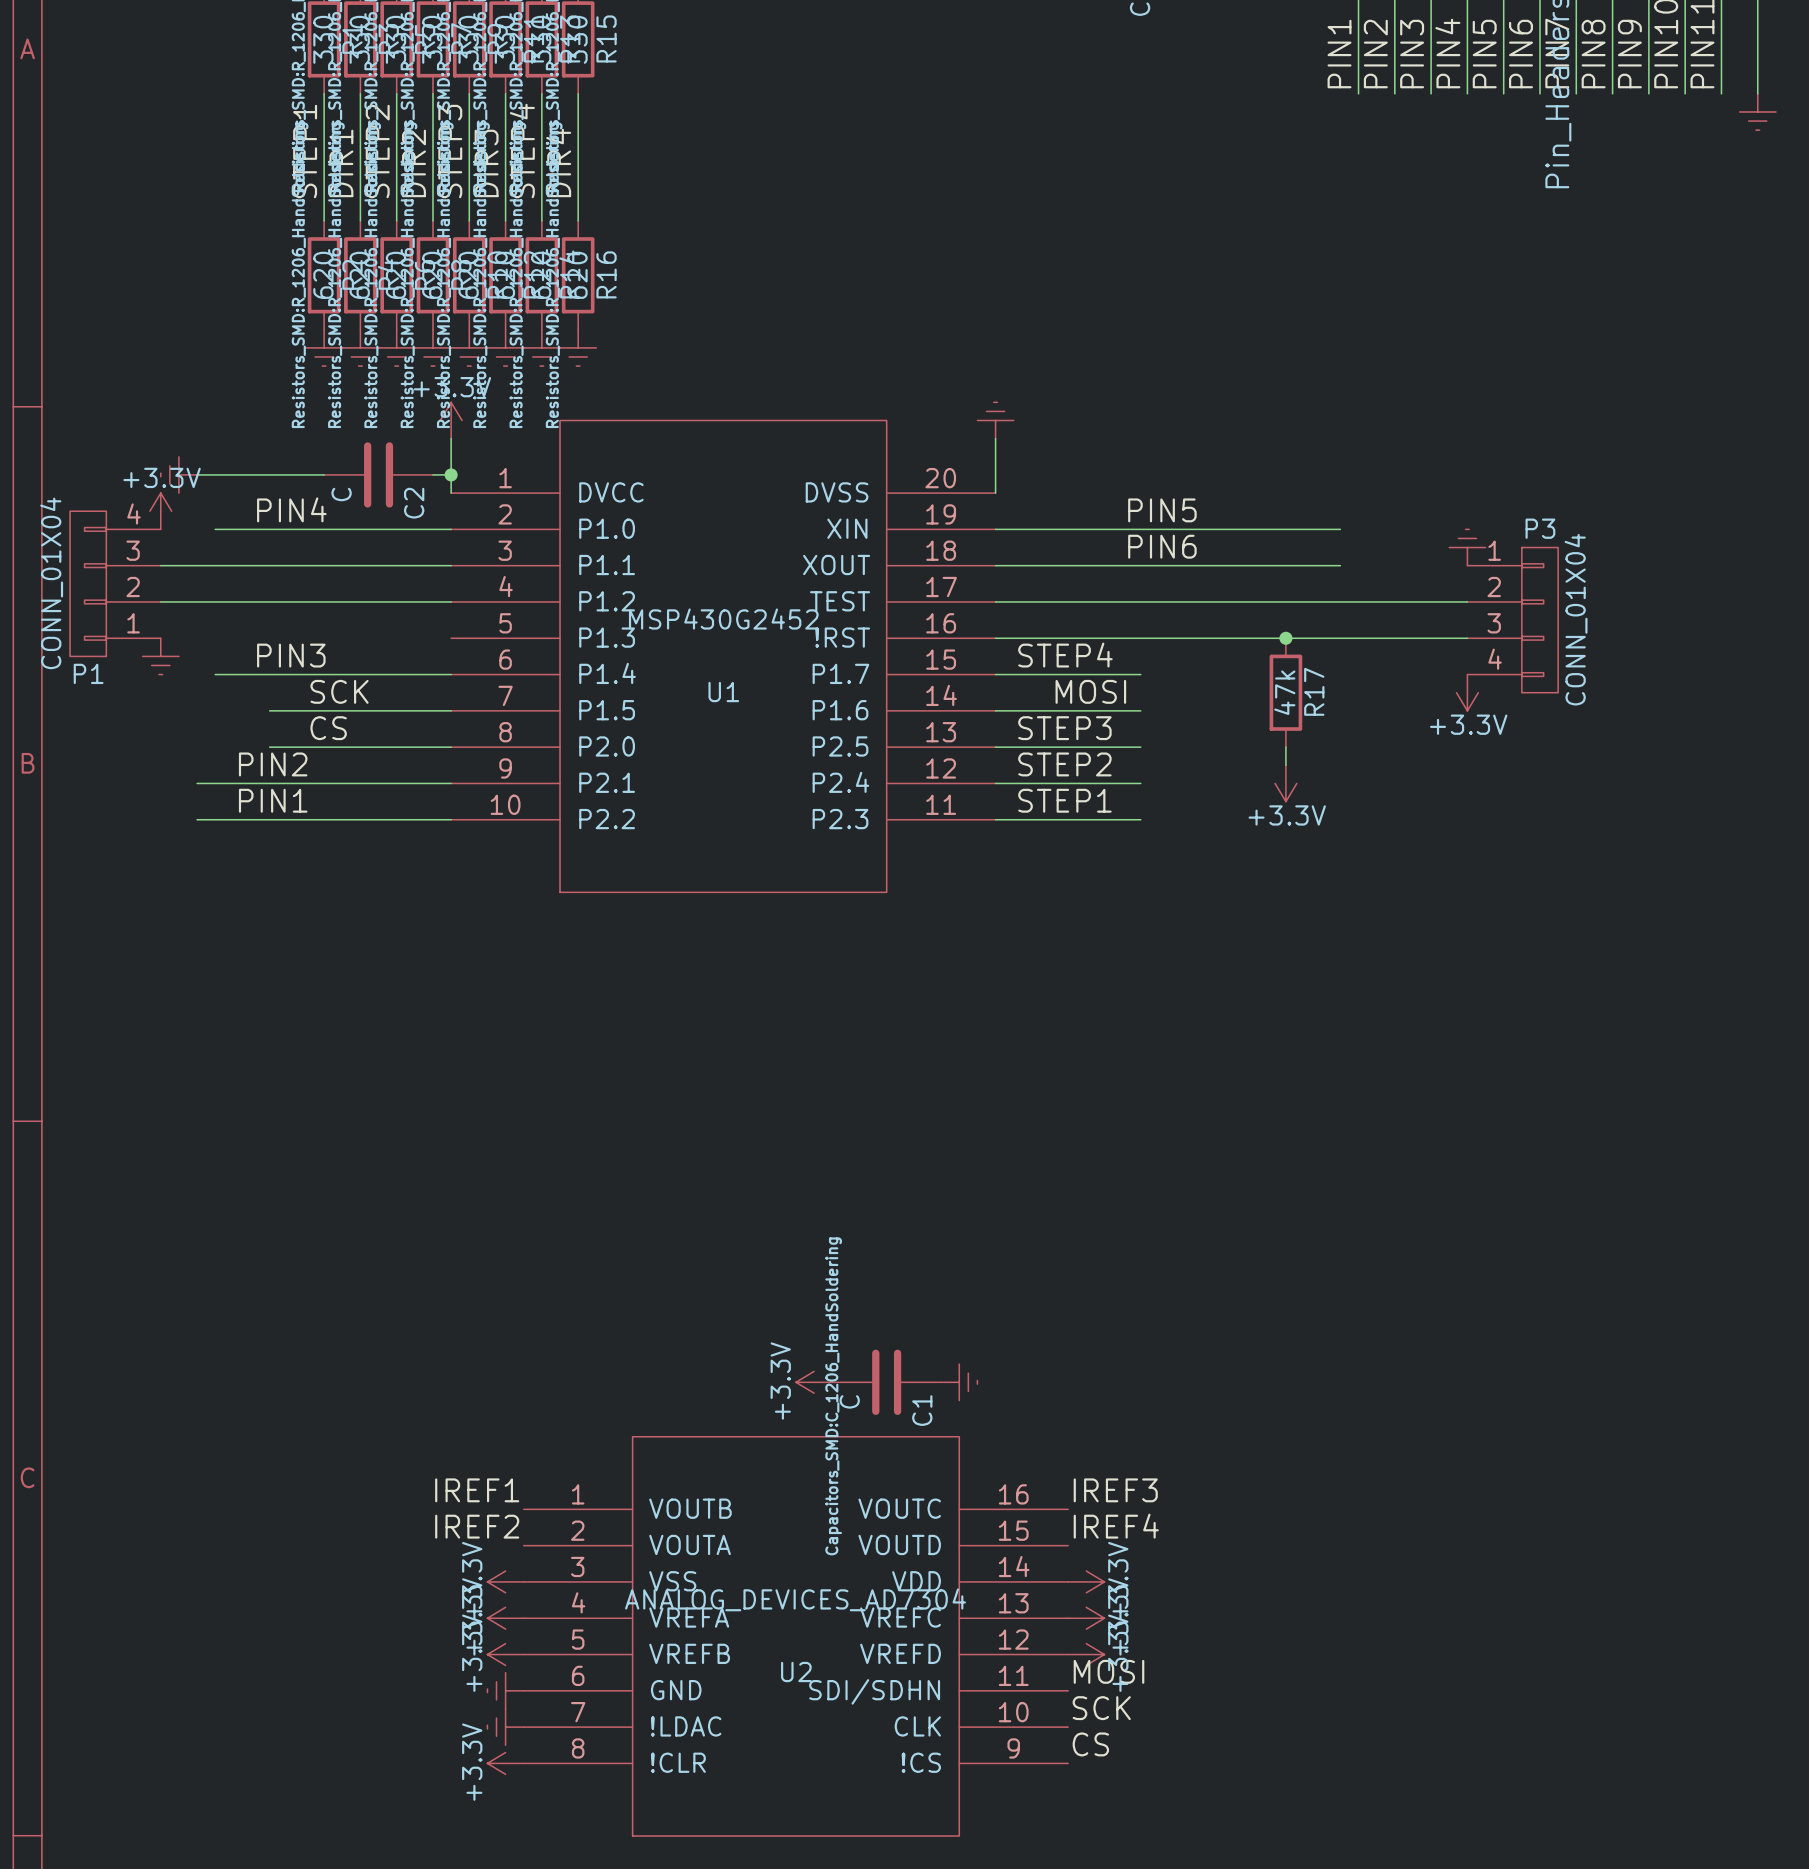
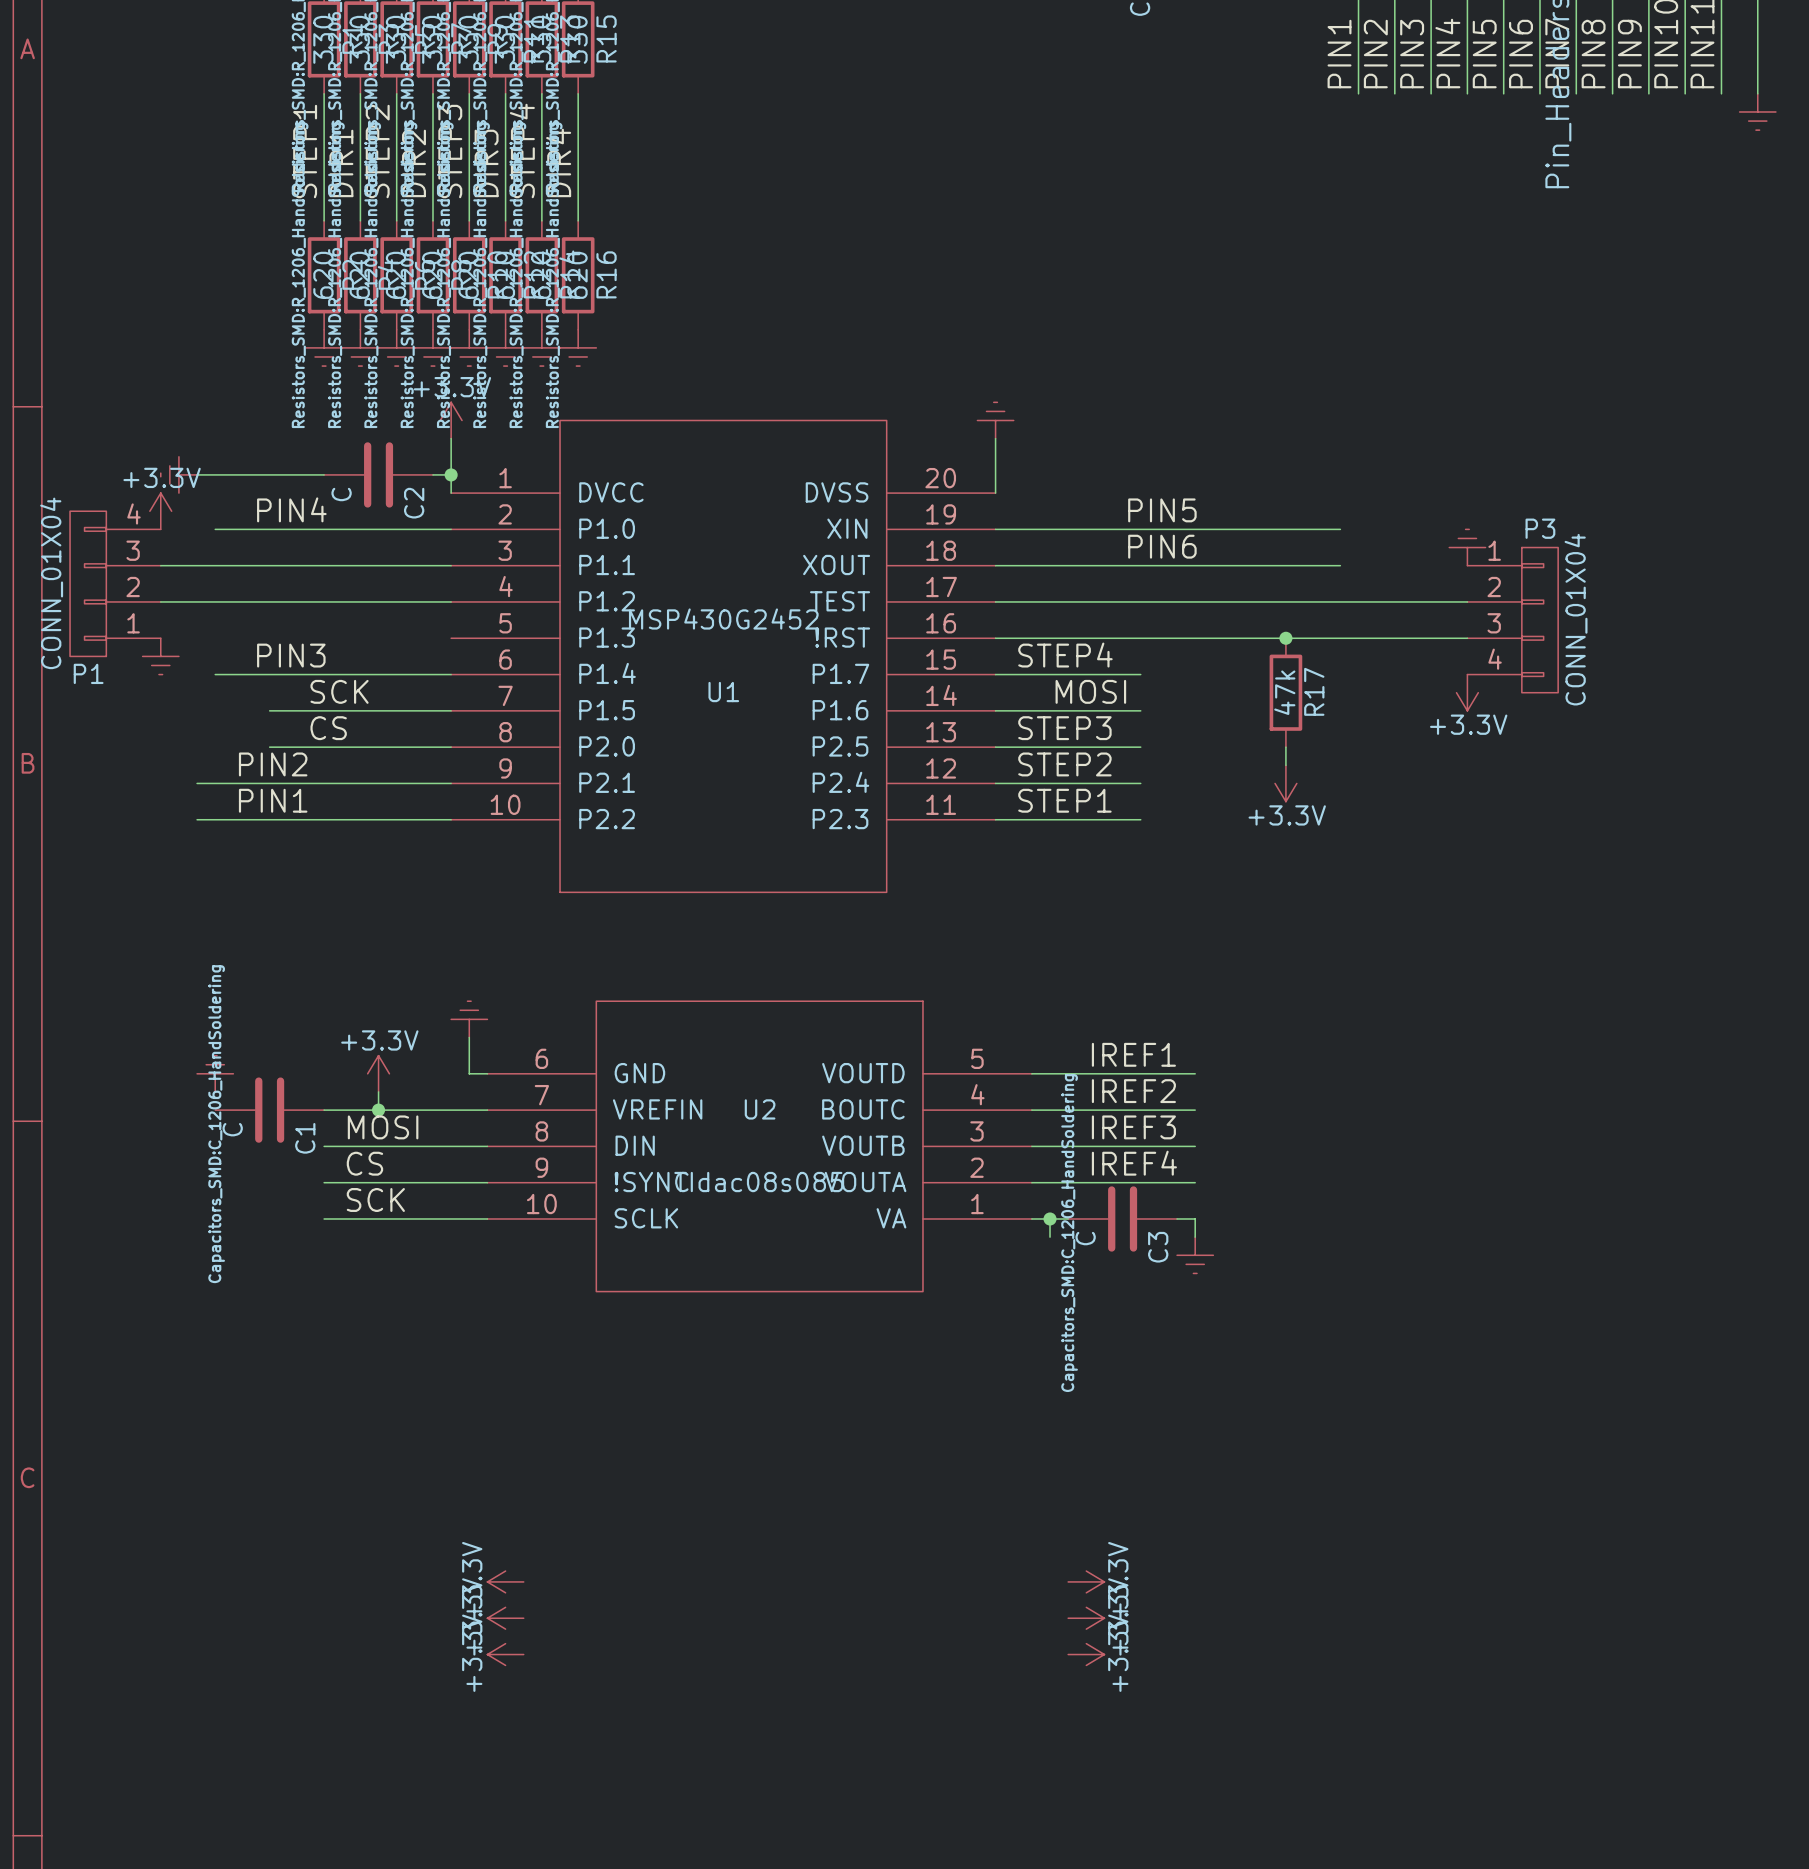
power symbol: none -> (469, 1019)
wire: none -> (469, 1037) (469, 1073) (487, 1073)
label: none -> IREF1 (1133, 1054)
power symbol: none -> (215, 1073)
power symbol: none -> +3.3V (378, 1073)
wire: none -> (1031, 1073) (1195, 1073)
wire: none -> (378, 1091) (378, 1110)
label: none -> IREF2 (1133, 1091)
wire: none -> (324, 1110) (487, 1110)
junction: none -> (378, 1110)
wire: none -> (1031, 1110) (1195, 1110)
label: none -> MOSI (383, 1127)
label: none -> IREF3 (1133, 1127)
wire: none -> (324, 1146) (487, 1146)
wire: none -> (1031, 1146) (1195, 1146)
label: none -> CS (364, 1163)
label: none -> IREF4 (1134, 1163)
wire: none -> (324, 1182) (487, 1182)
wire: none -> (1031, 1182) (1195, 1182)
label: none -> SCK (375, 1199)
wire: none -> (324, 1218) (487, 1218)
wire: none -> (1031, 1218) (1068, 1218)
wire: none -> (1050, 1218) (1050, 1237)
junction: none -> (1050, 1218)
C3: none -> C (1122, 1218)
wire: none -> (1177, 1218) (1195, 1218) (1195, 1237)
power symbol: +3.3V (814, 1382) -> none
C1 position: (886, 1382) -> (269, 1110)
power symbol rotation: 0° (959, 1382) -> 90° clockwise (1195, 1255)
power symbol position: (959, 1382) -> (1195, 1255)
U2 symbol: [523, 1436, 1069, 1837] -> [487, 1001, 1032, 1292]
label: IREF1 (477, 1490) -> none
label: IREF3 (1115, 1490) -> none
label: IREF2 (477, 1526) -> none
label: IREF4 (1116, 1526) -> none
U2 value: ANALOG_DEVICES_AD7304 (795, 1599) -> TIdac08s085 (758, 1182)
label: MOSI (1109, 1671) -> none
U2 name position: U2 (796, 1672) -> U2 (760, 1109)
power symbol: (505, 1690) -> none
label: SCK (1101, 1708) -> none
power symbol: (505, 1727) -> none
label: CS (1090, 1744) -> none
power symbol: +3.3V (505, 1763) -> none

